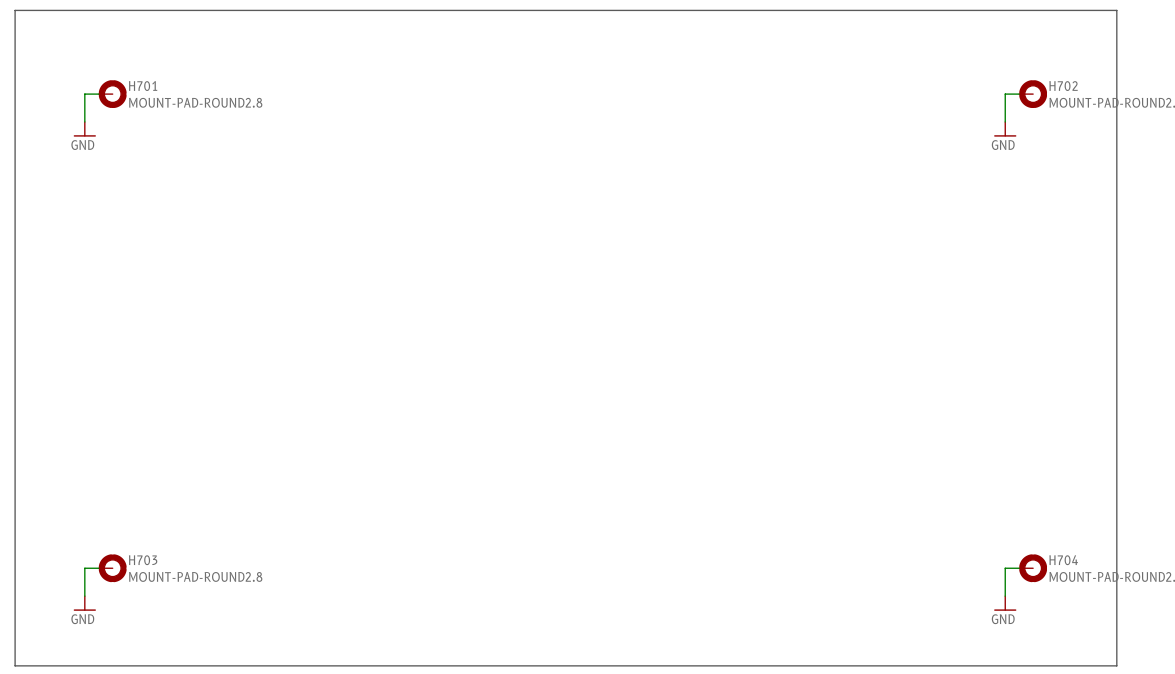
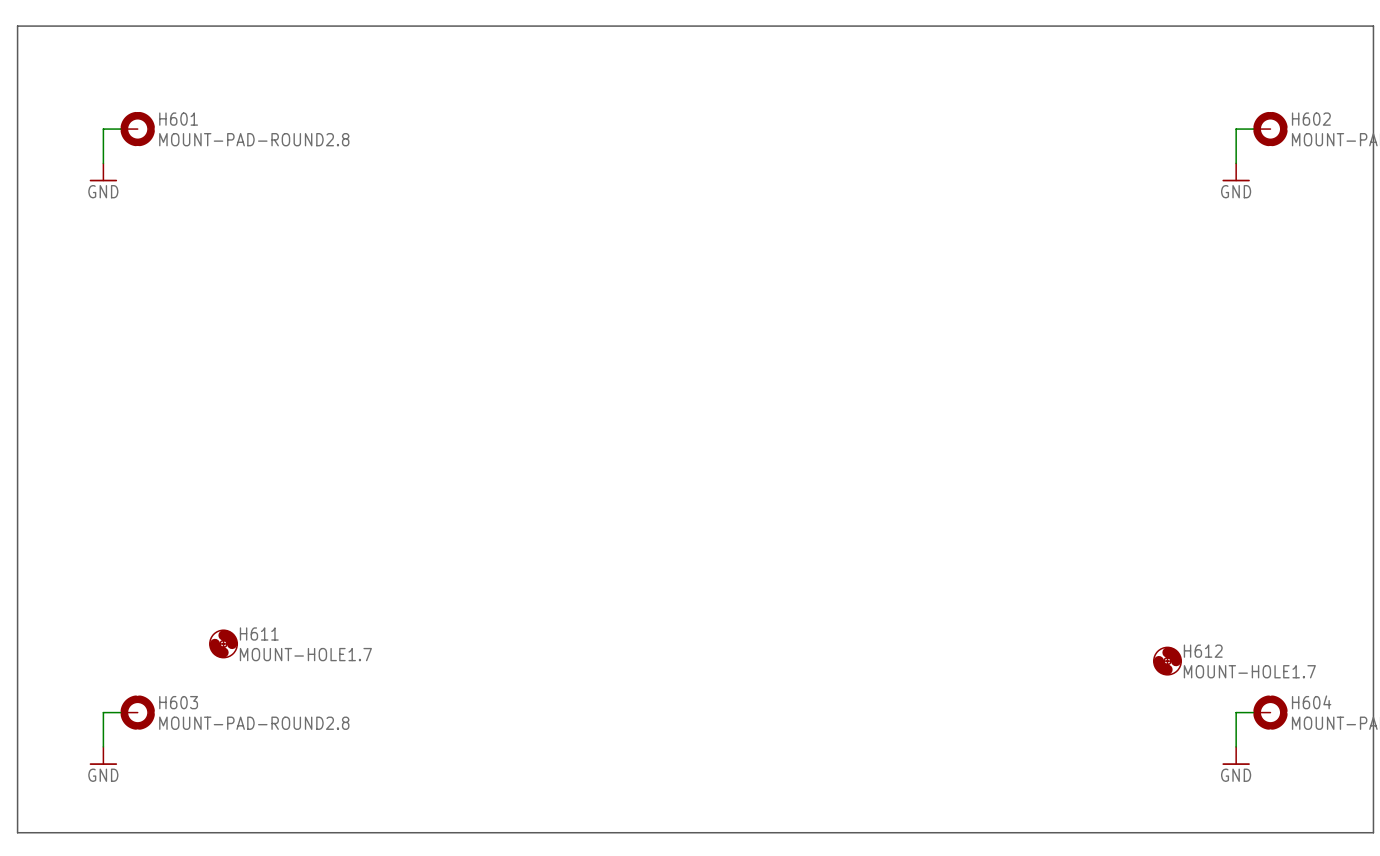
H701 name: H701 (143, 86) -> H601 (178, 119)
H702 name: H702 (1063, 86) -> H602 (1311, 119)
H611: none -> MOUNT-HOLE1.7 (223, 643)
H612: none -> MOUNT-HOLE1.7 (1167, 661)
H703 name: H703 (143, 560) -> H603 (178, 702)
H704 name: H704 (1063, 560) -> H604 (1311, 702)

